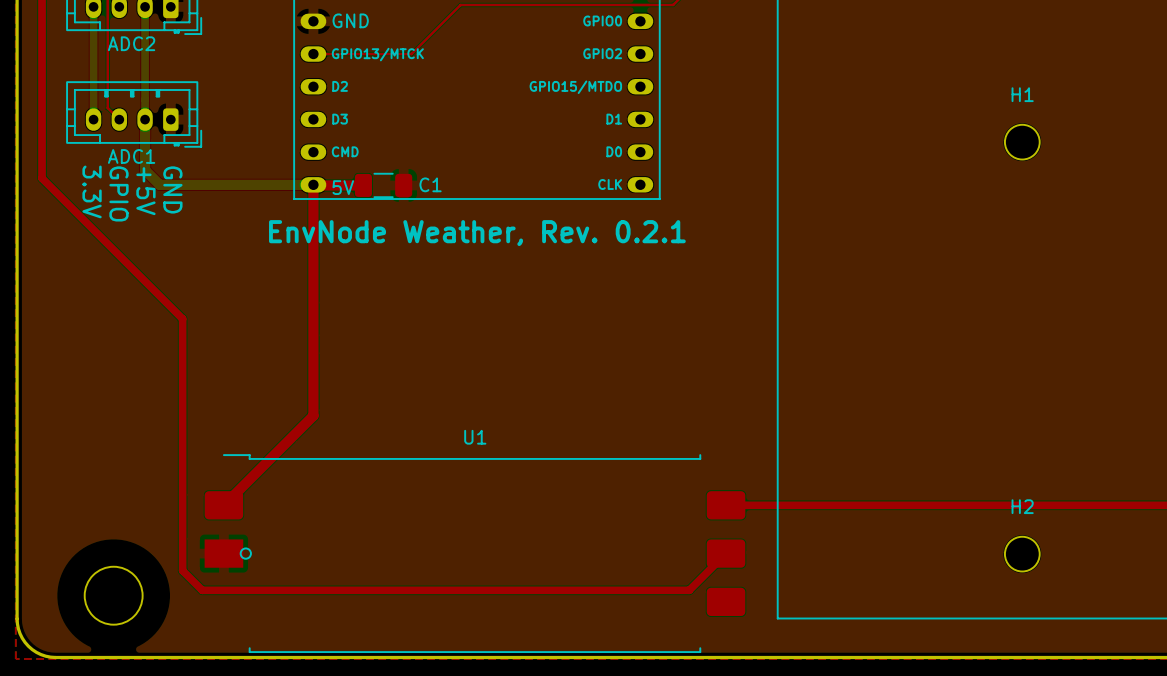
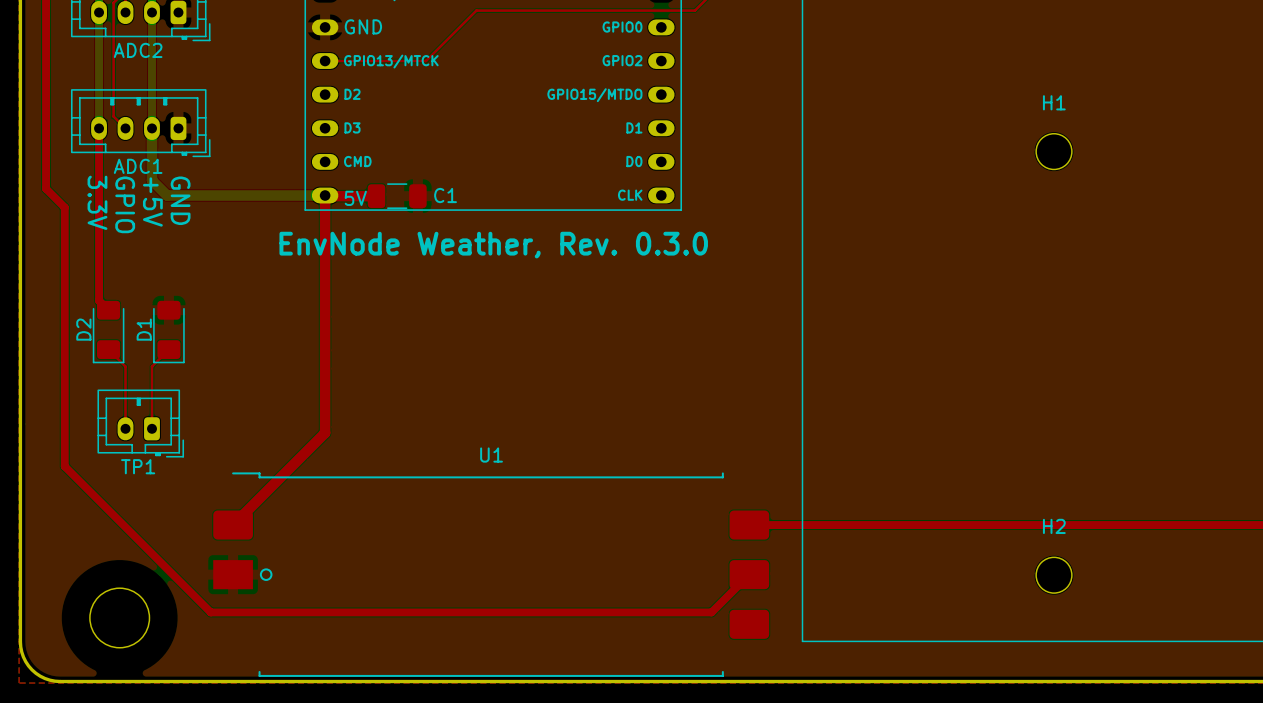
top track: none -> (99, 128) (99, 300) (108, 310)
top track: (60, 196) (182, 318) (182, 570) -> (64, 207) (64, 466) (190, 592)
text: EnvNode Weather, Rev. 0.2.1 (477, 233) -> EnvNode Weather, Rev. 0.3.0 (493, 245)
D2: none -> (108, 332)
D1: none -> (168, 332)
top track: none -> (108, 349) (125, 366) (125, 428)
top track: none -> (168, 349) (151, 366) (151, 428)
TP1: none -> (140, 423)
U1 footprint: [204, 454, 746, 654] -> [213, 472, 770, 677]

